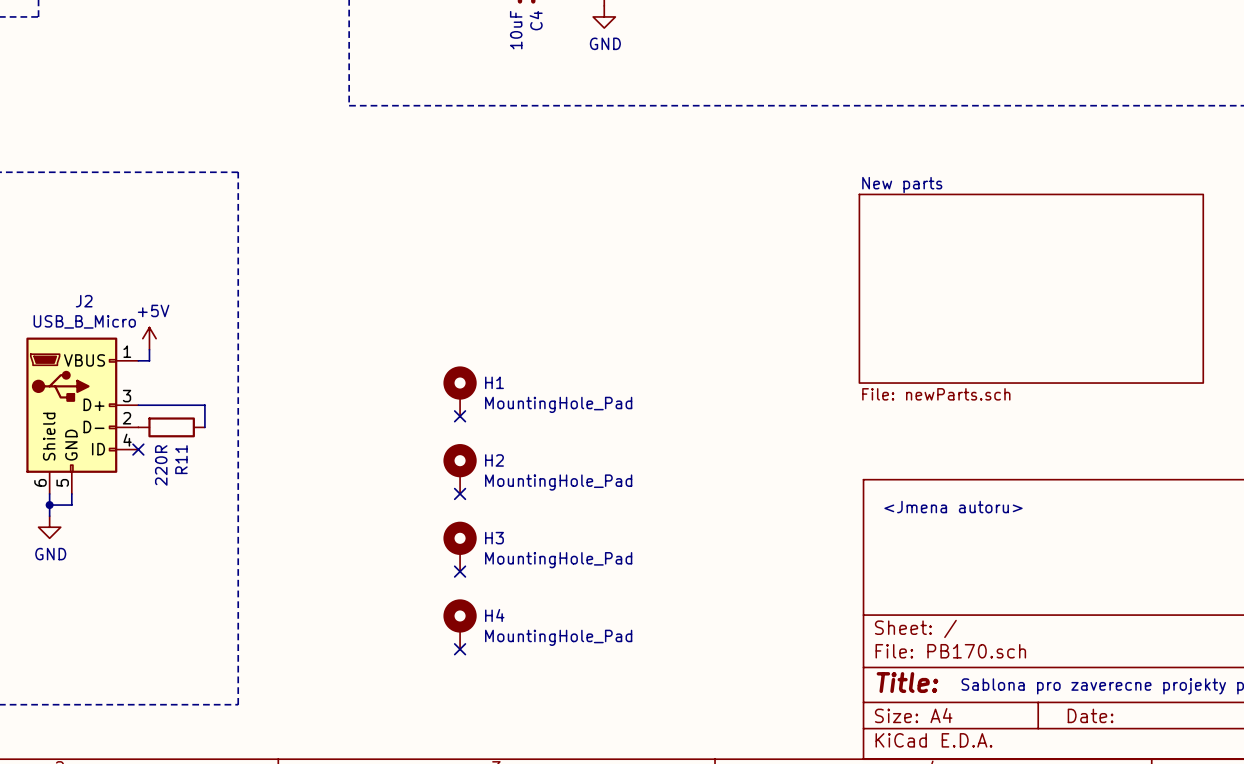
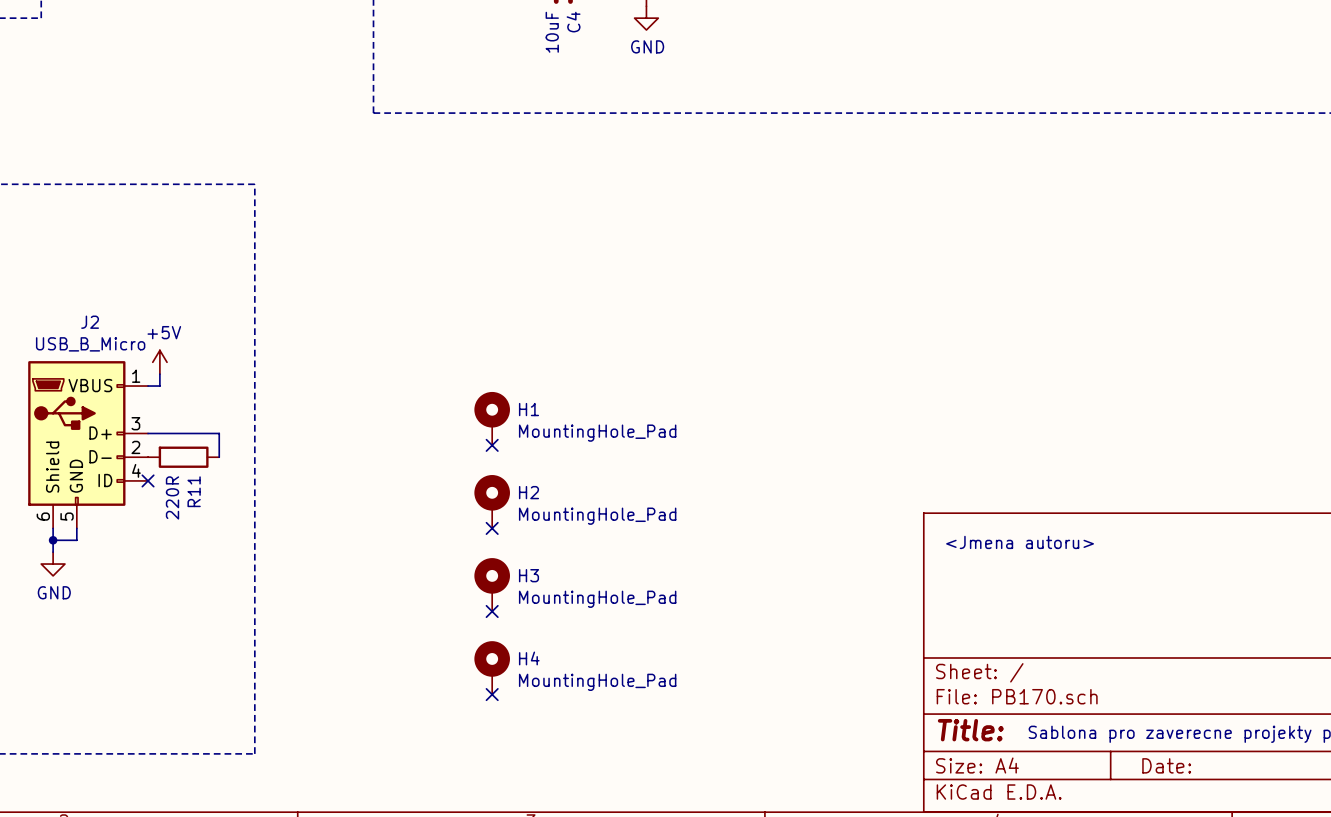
sheet New parts: File: newParts.sch (1031, 288) -> none

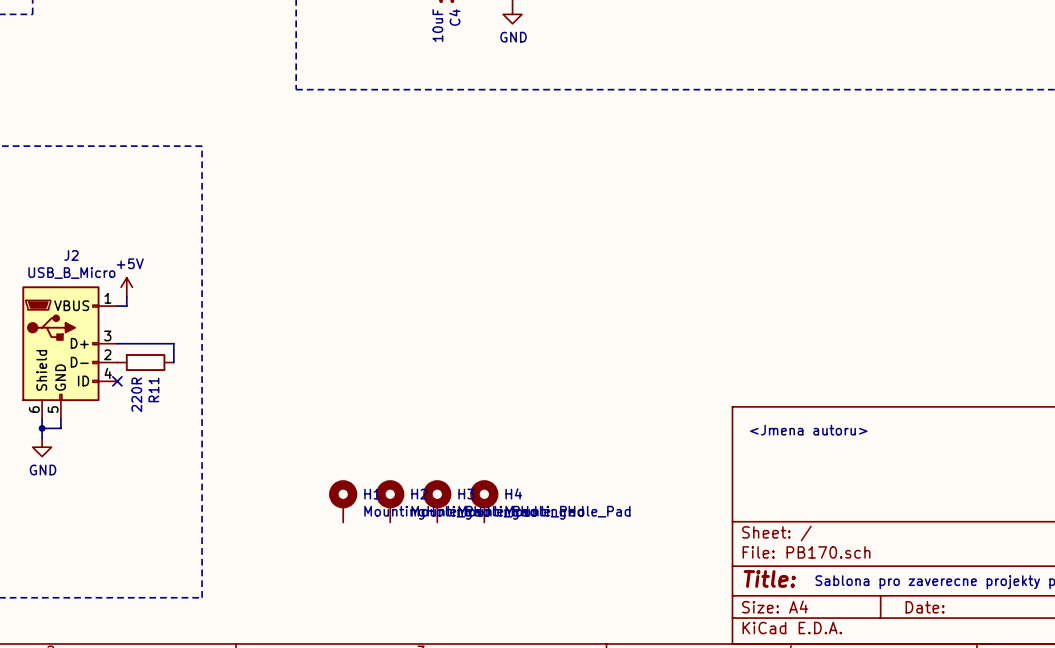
H1 position: (492, 418) -> (343, 501)
no-connect mark: (492, 445) -> none
H2 position: (492, 501) -> (390, 501)
no-connect mark: (492, 528) -> none
H3 position: (492, 584) -> (437, 501)
no-connect mark: (492, 611) -> none
H4 position: (492, 667) -> (484, 501)
no-connect mark: (492, 694) -> none

